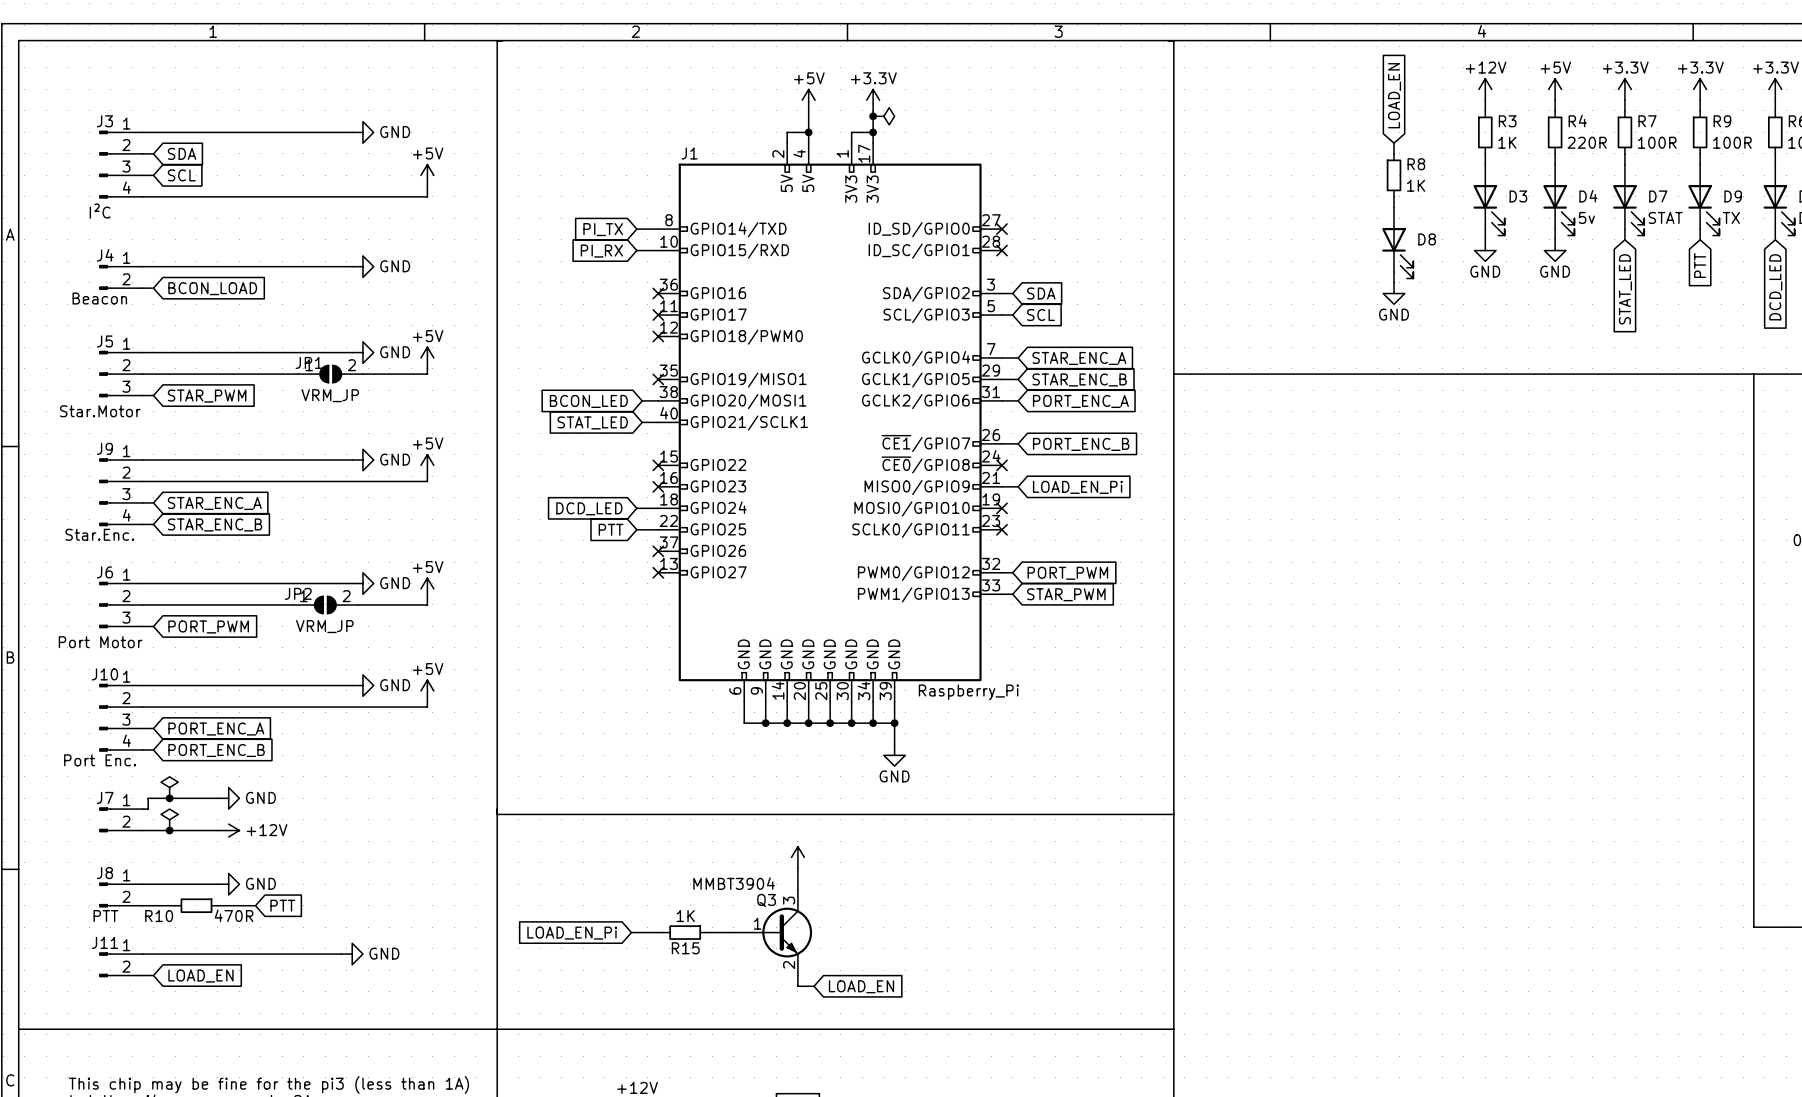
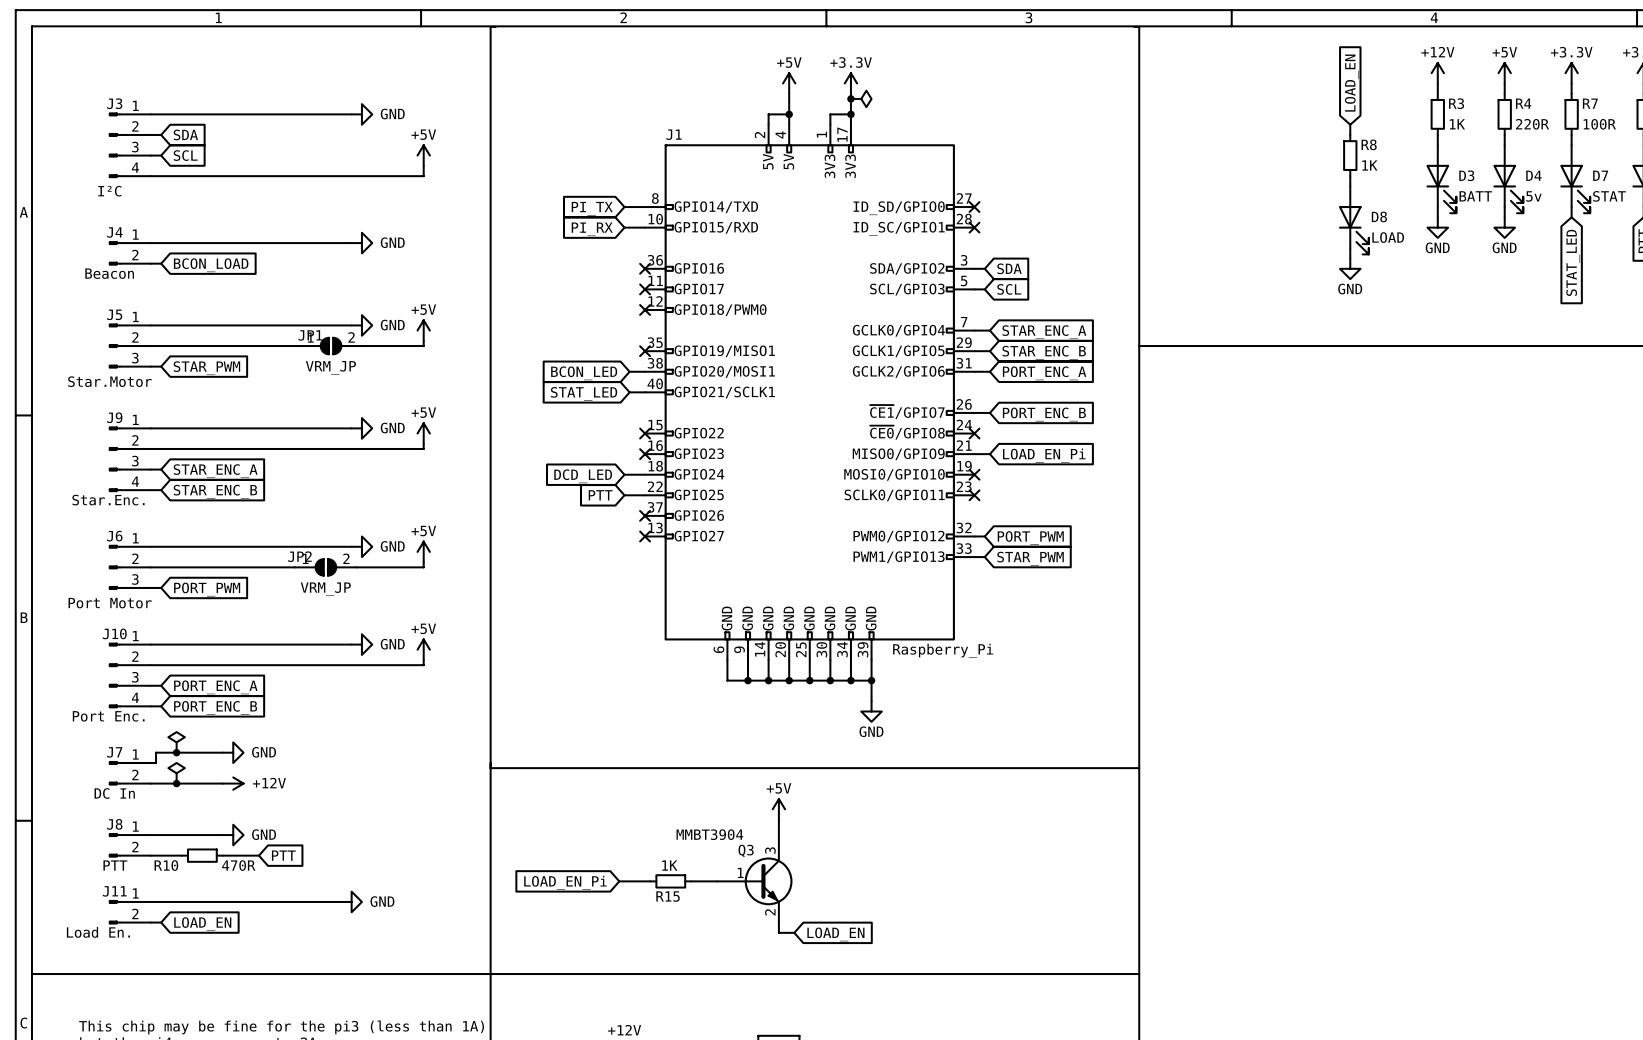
D3 value: none -> BATT (1475, 196)
D8 value: none -> LOAD (1388, 237)
power symbol text: none -> +5V (779, 788)
J7 value: none -> DC In (114, 793)
J11 value: none -> Load En. (98, 932)

